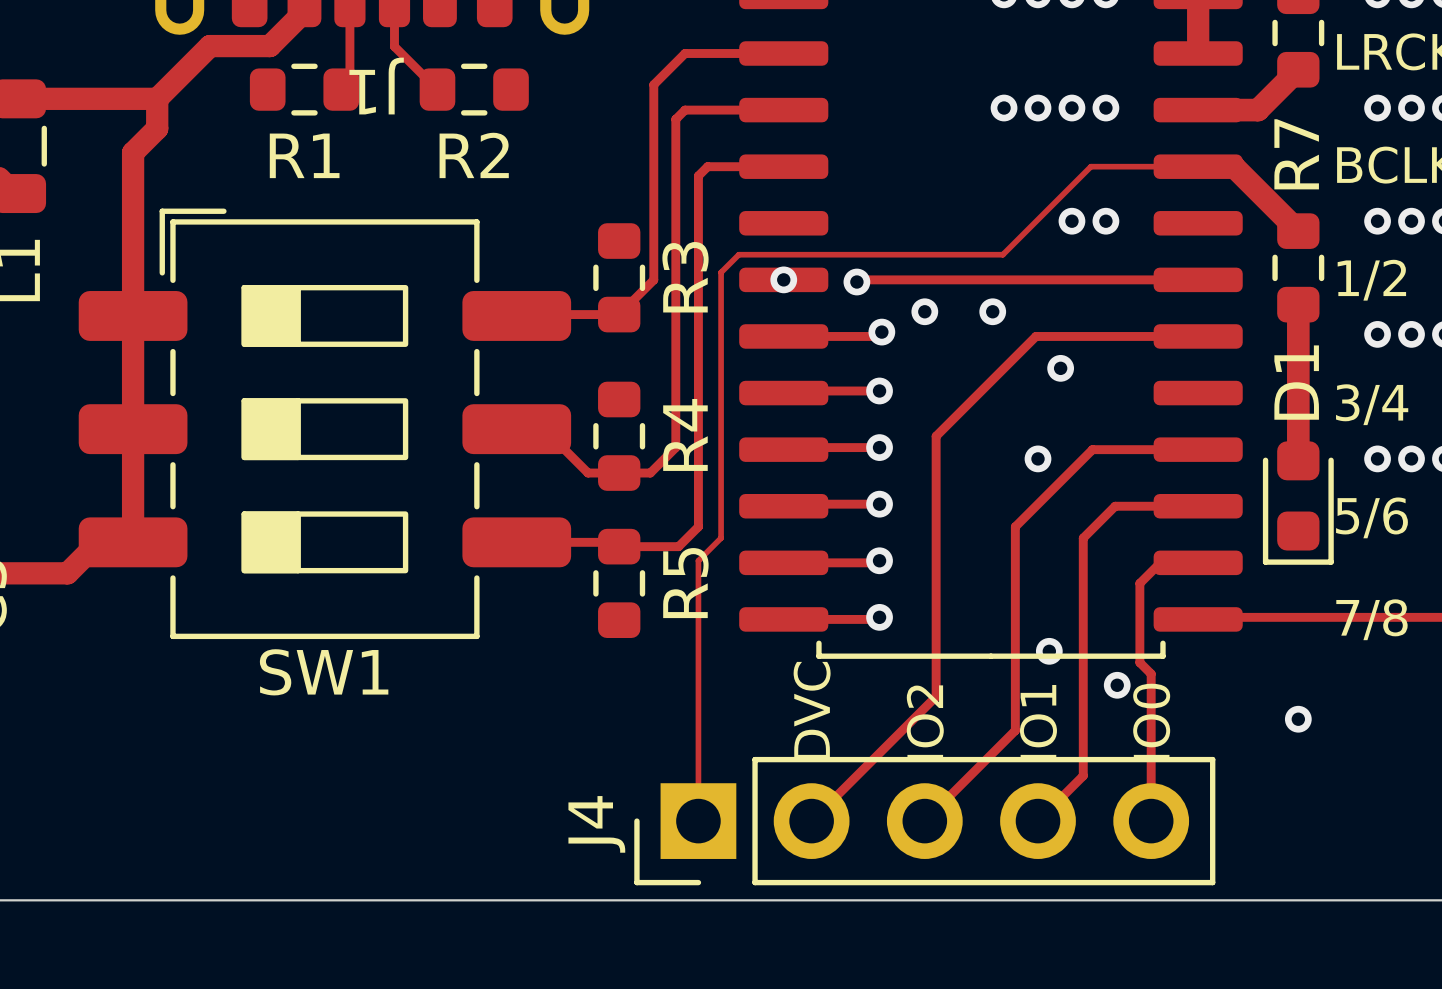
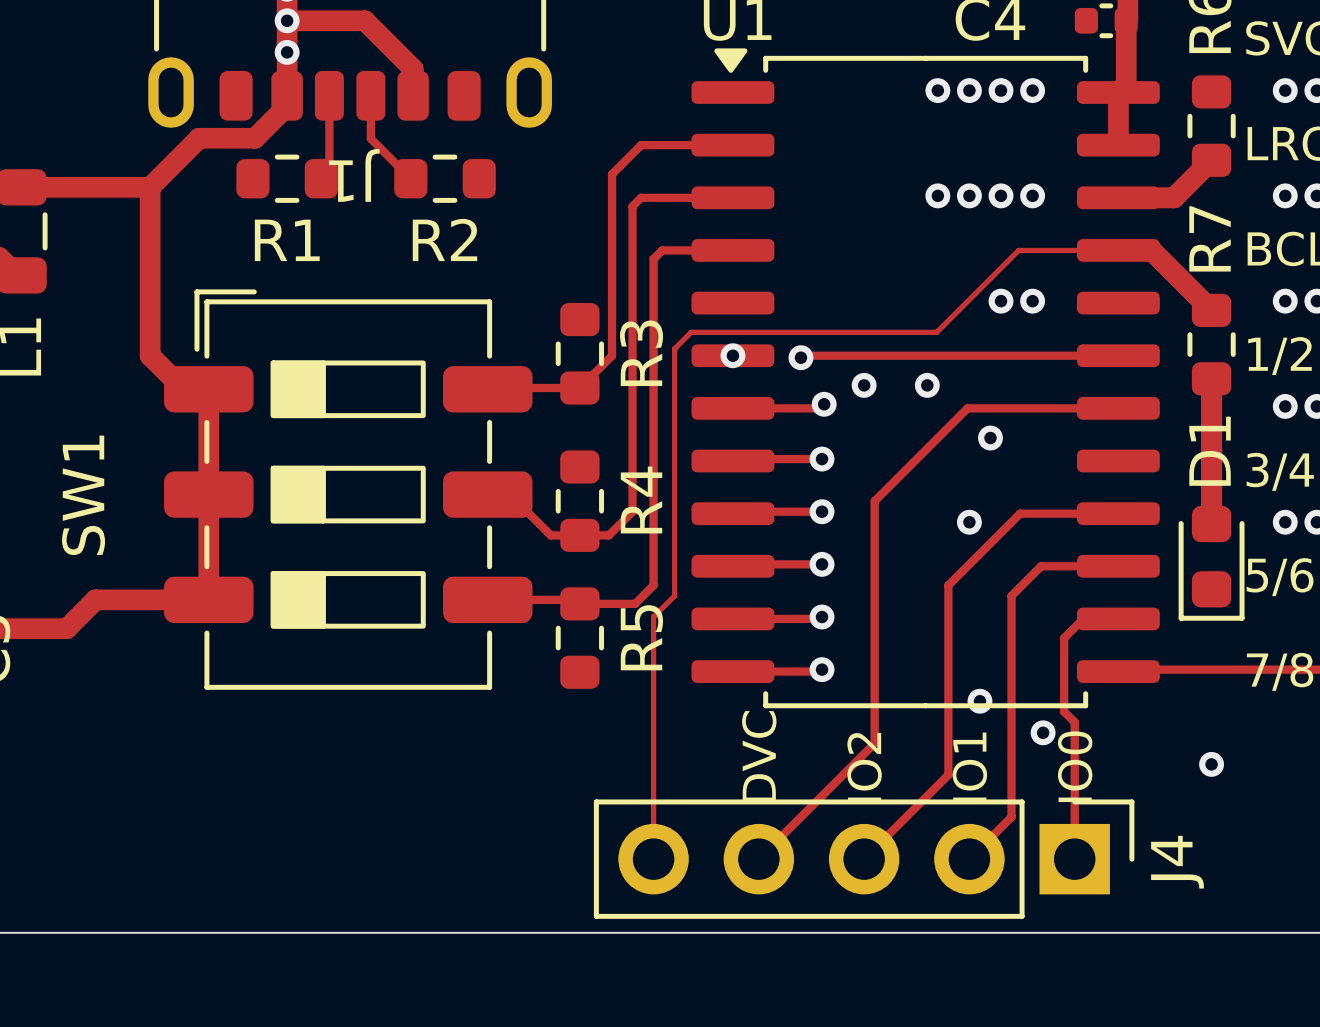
track: (157, 128) (133, 152) (133, 542) -> (150, 215) (150, 355) (183, 389) (208, 389) (208, 599) (95, 599)
SW1 footprint: [78, 208, 572, 640] -> [164, 289, 533, 690]
SW1 name position: SW1 (324, 672) -> SW1 (83, 495)
J4 rotation: 0° (924, 821) -> 180° (864, 859)

